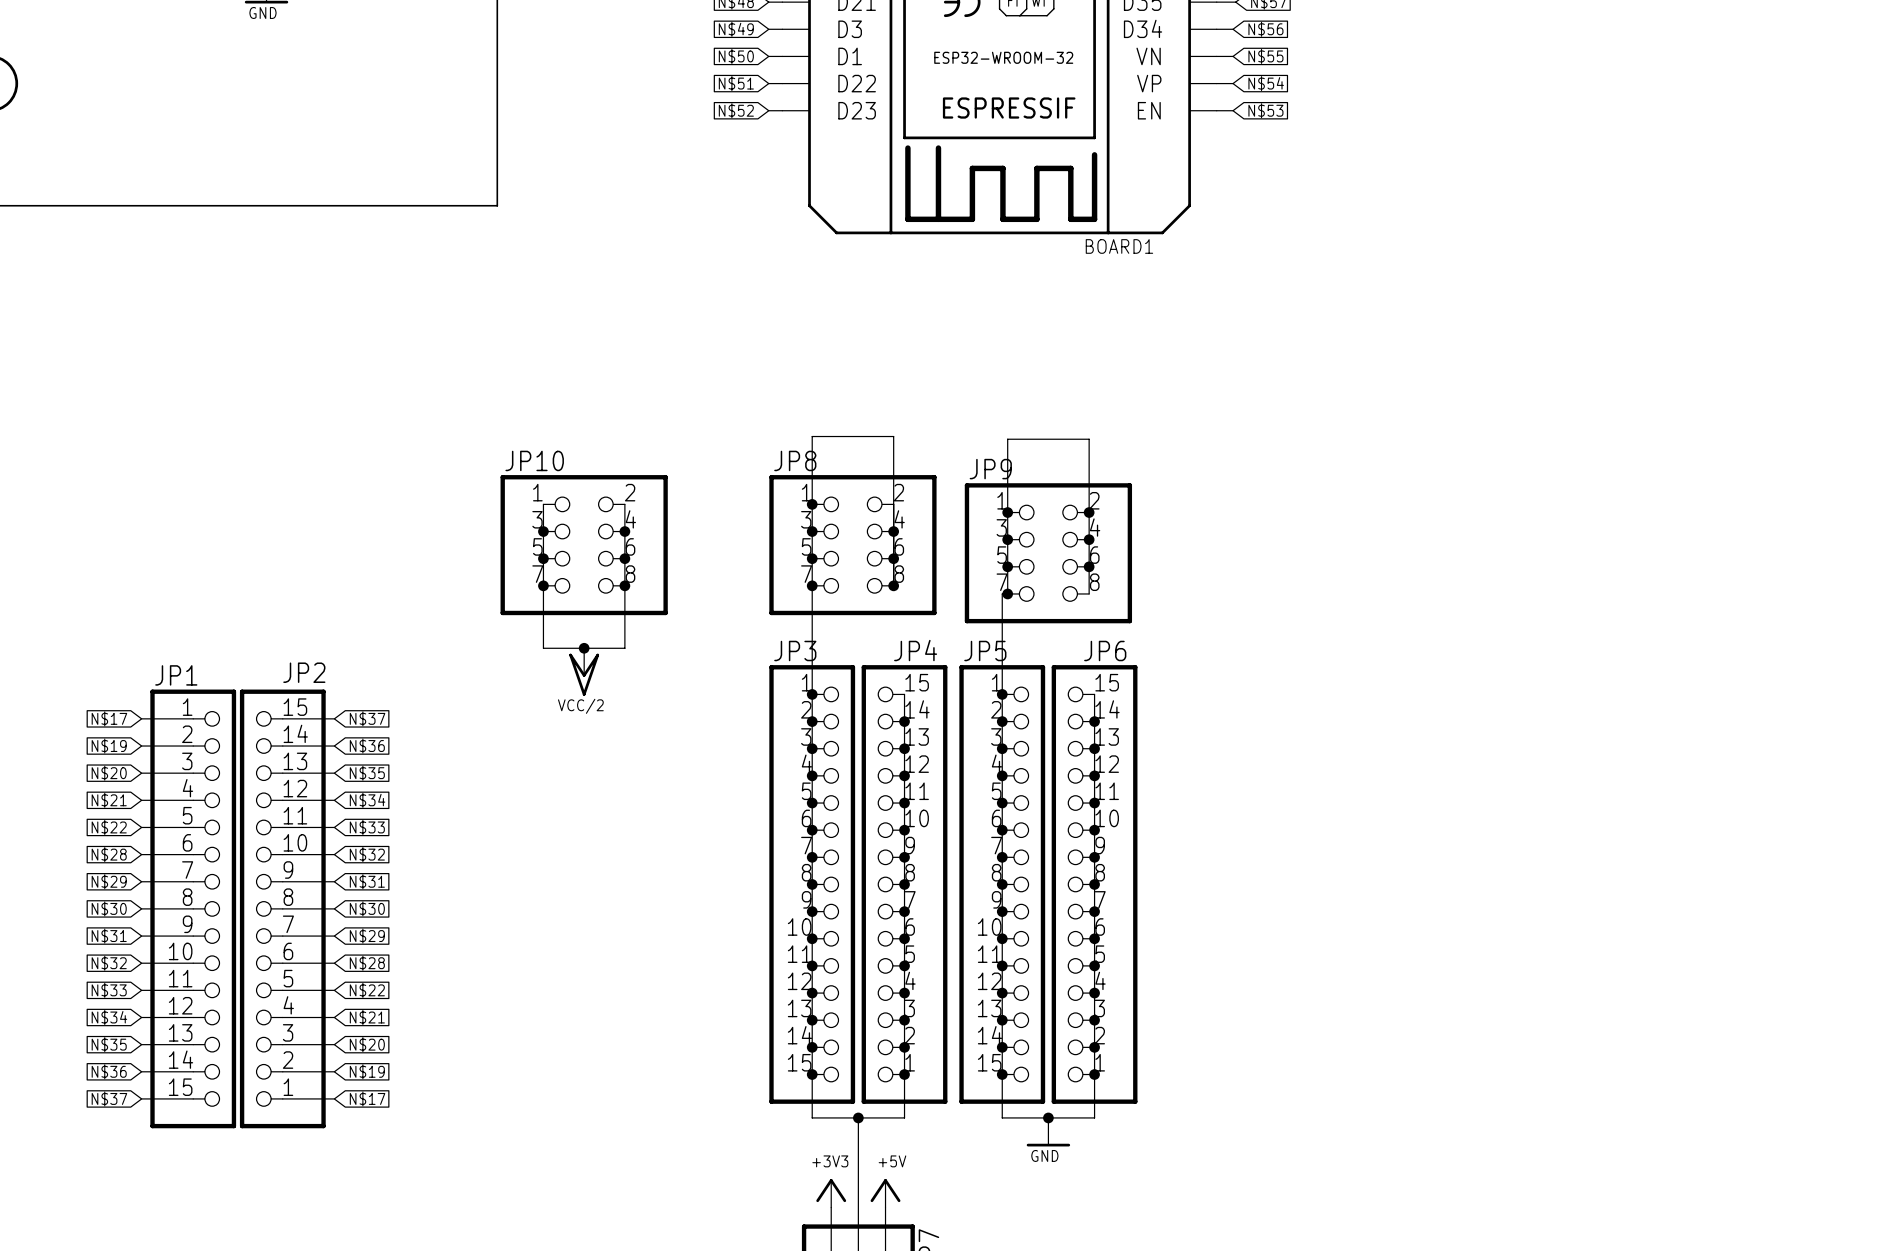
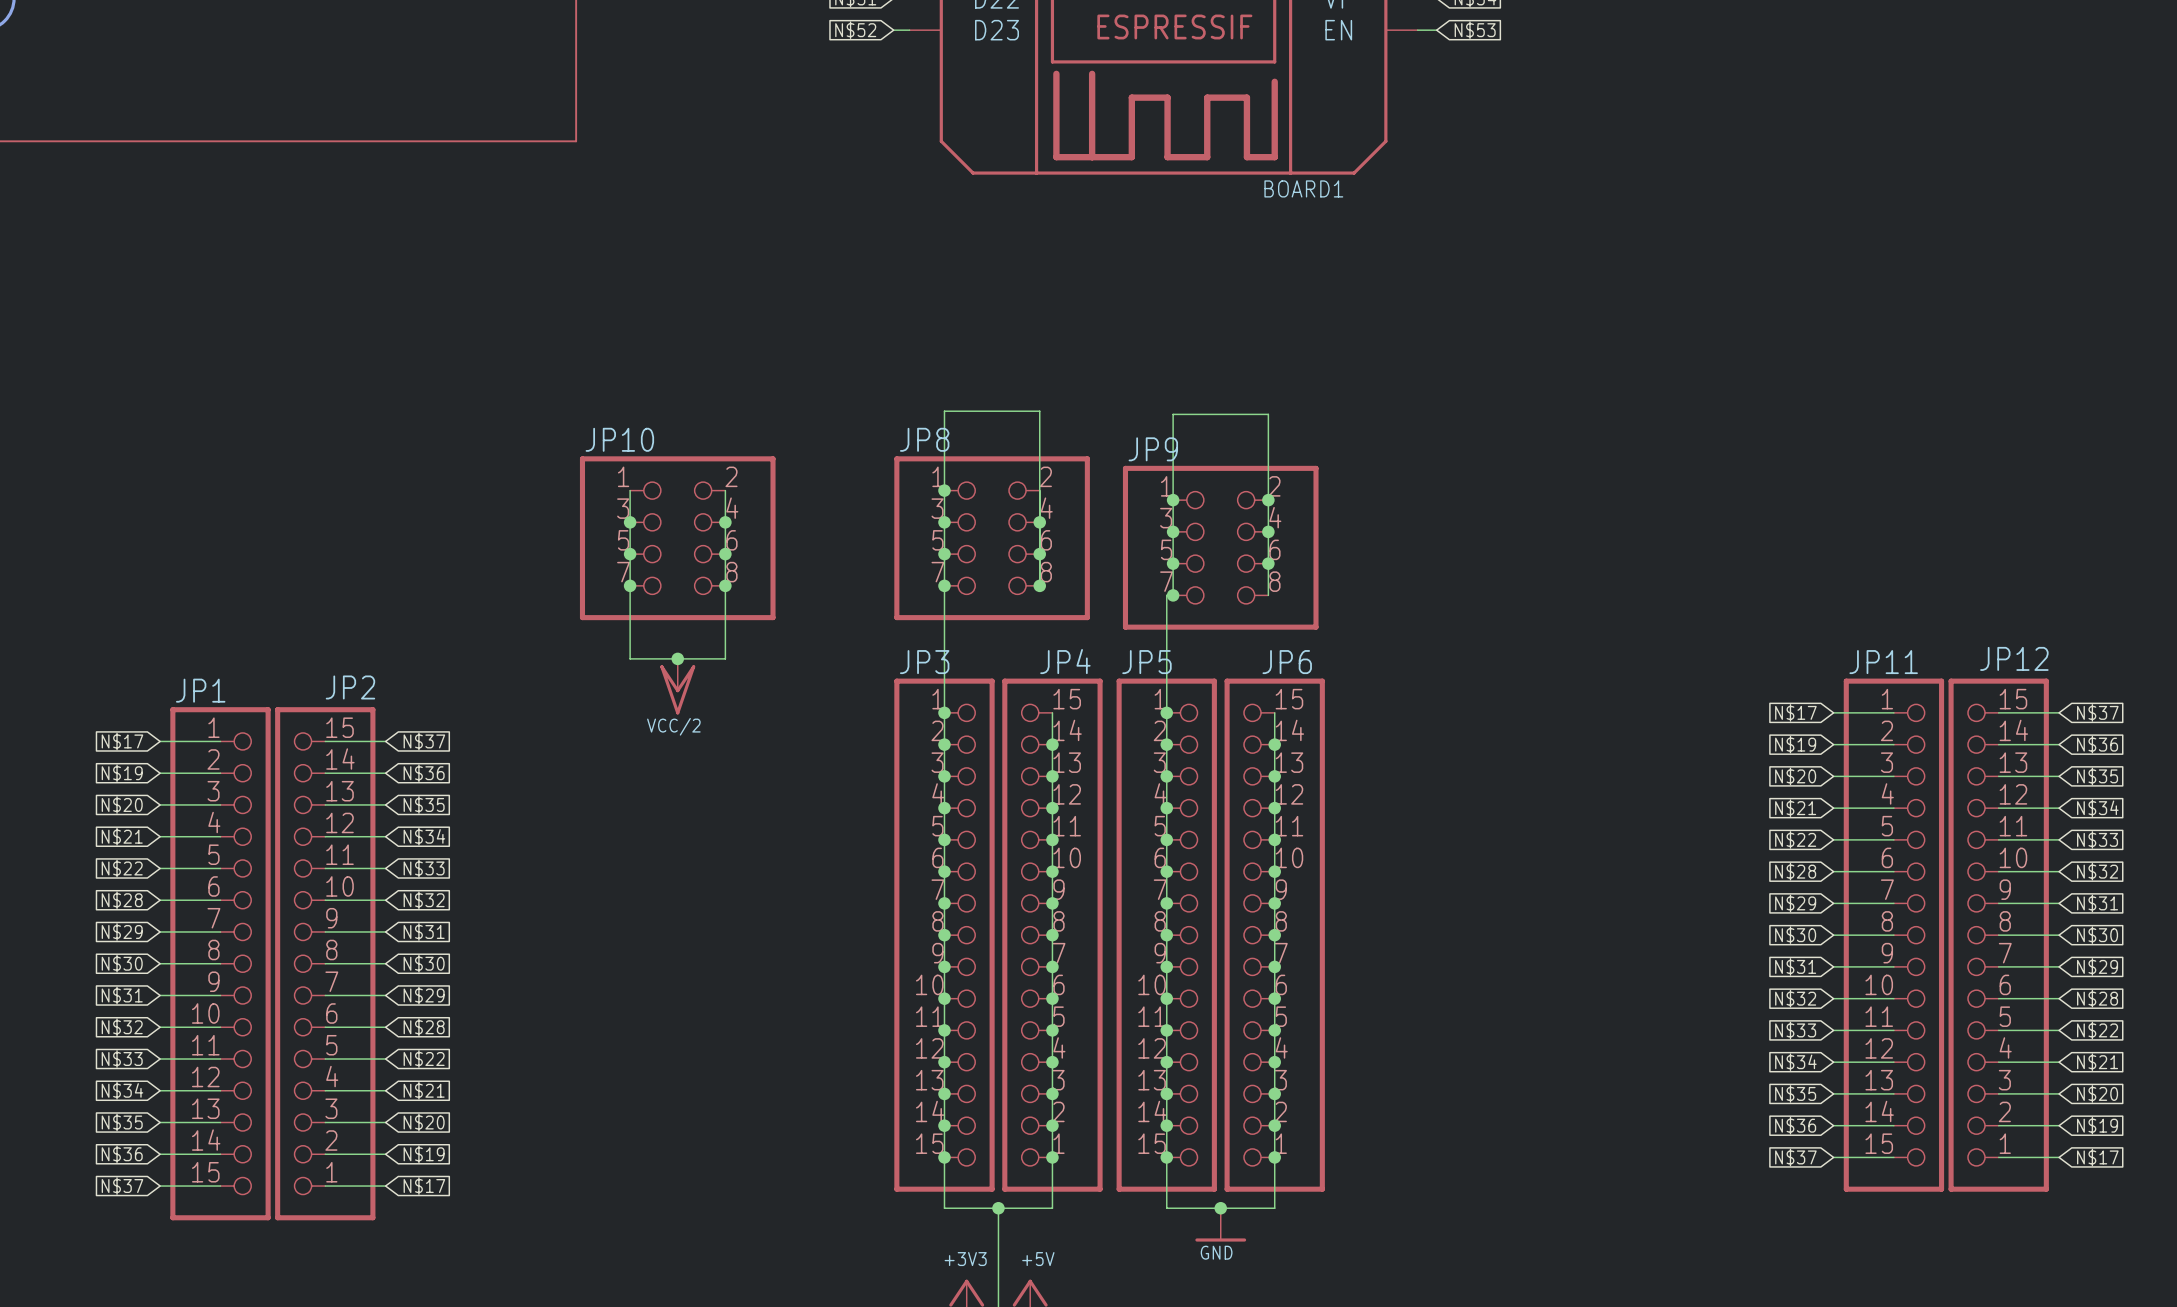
global label: none -> N$17 (1795, 712)
wire: none -> (1833, 712) (1893, 712)
wire: none -> (1998, 712) (2059, 712)
global label: none -> N$37 (2097, 712)
global label: none -> N$19 (1795, 744)
wire: none -> (1833, 744) (1893, 744)
wire: none -> (1998, 744) (2059, 744)
global label: none -> N$36 (2097, 744)
global label: none -> N$20 (1795, 776)
wire: none -> (1833, 776) (1893, 776)
wire: none -> (1998, 776) (2059, 776)
global label: none -> N$35 (2097, 776)
global label: none -> N$21 (1795, 808)
wire: none -> (1833, 808) (1893, 808)
wire: none -> (1998, 808) (2059, 808)
global label: none -> N$34 (2097, 808)
global label: none -> N$22 (1795, 839)
wire: none -> (1833, 839) (1893, 839)
wire: none -> (1998, 839) (2059, 839)
global label: none -> N$33 (2097, 839)
global label: none -> N$28 (1795, 871)
wire: none -> (1833, 871) (1893, 871)
wire: none -> (1998, 871) (2059, 871)
global label: none -> N$32 (2097, 871)
global label: none -> N$29 (1795, 903)
wire: none -> (1833, 903) (1893, 903)
wire: none -> (1998, 903) (2059, 903)
global label: none -> N$31 (2097, 903)
global label: none -> N$30 (1795, 935)
wire: none -> (1833, 935) (1893, 935)
JP11: none -> (1893, 935)
wire: none -> (1998, 935) (2059, 935)
JP12: none -> (1998, 935)
global label: none -> N$30 (2097, 935)
global label: none -> N$31 (1795, 966)
wire: none -> (1833, 966) (1893, 966)
wire: none -> (1998, 966) (2059, 966)
global label: none -> N$29 (2097, 966)
global label: none -> N$32 (1795, 998)
wire: none -> (1833, 998) (1893, 998)
wire: none -> (1998, 998) (2059, 998)
global label: none -> N$28 (2097, 998)
global label: none -> N$33 (1795, 1030)
wire: none -> (1833, 1030) (1893, 1030)
wire: none -> (1998, 1030) (2059, 1030)
global label: none -> N$22 (2097, 1030)
global label: none -> N$34 (1795, 1062)
wire: none -> (1833, 1062) (1893, 1062)
wire: none -> (1998, 1062) (2059, 1062)
global label: none -> N$21 (2097, 1062)
global label: none -> N$35 (1795, 1093)
wire: none -> (1833, 1093) (1893, 1093)
wire: none -> (1998, 1093) (2059, 1093)
global label: none -> N$20 (2097, 1093)
global label: none -> N$36 (1795, 1125)
wire: none -> (1833, 1125) (1893, 1125)
wire: none -> (1998, 1125) (2059, 1125)
global label: none -> N$19 (2097, 1125)
global label: none -> N$37 (1795, 1157)
wire: none -> (1833, 1157) (1893, 1157)
wire: none -> (1998, 1157) (2059, 1157)
global label: none -> N$17 (2097, 1157)

